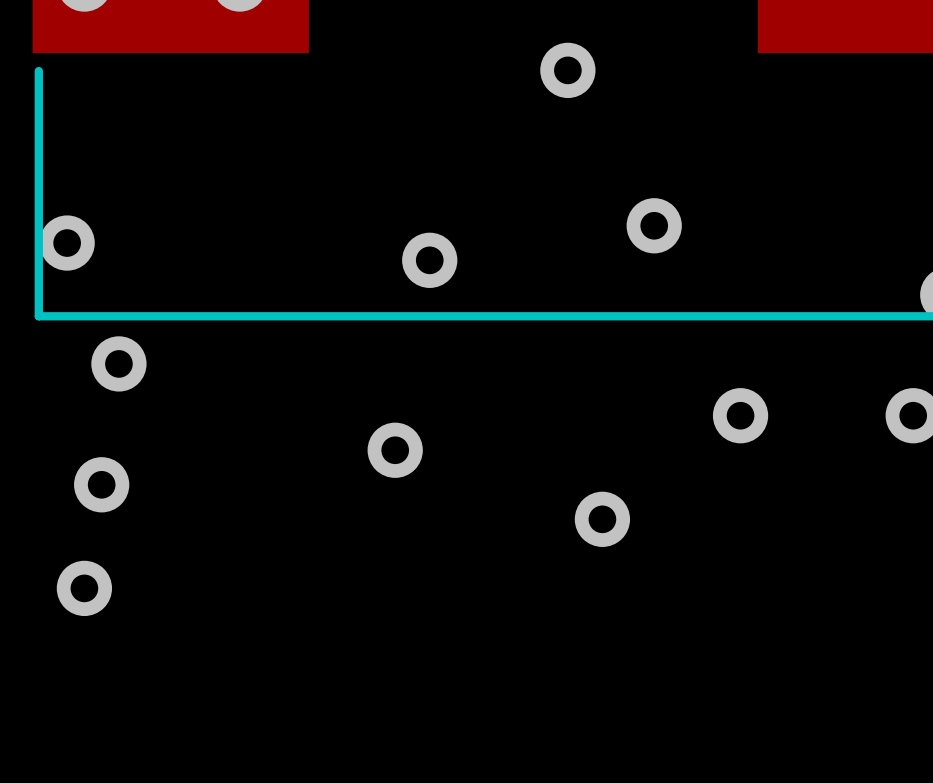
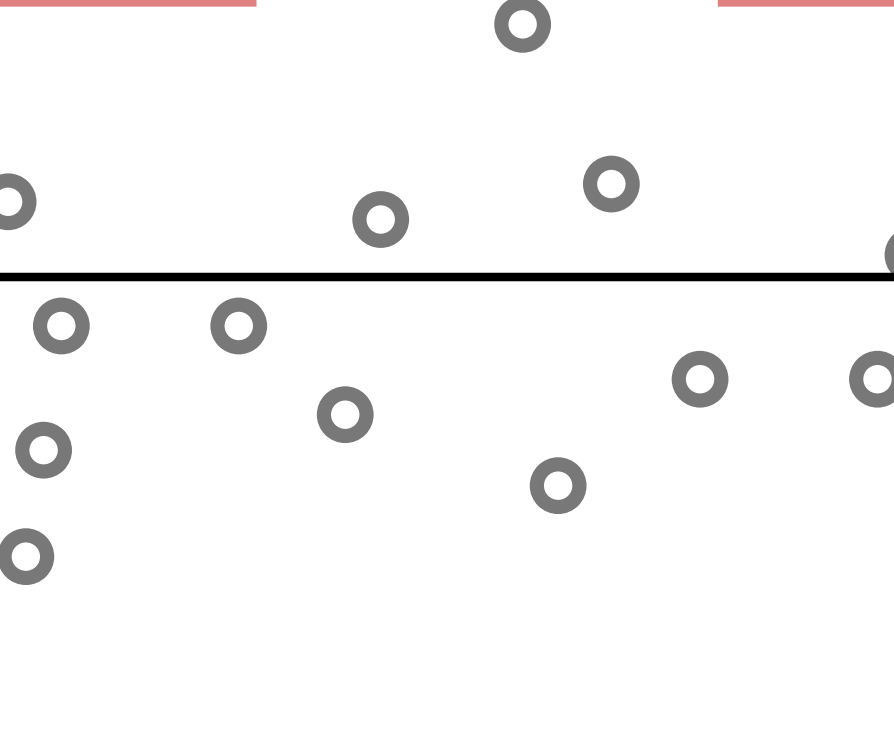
via: none -> (238, 325)

